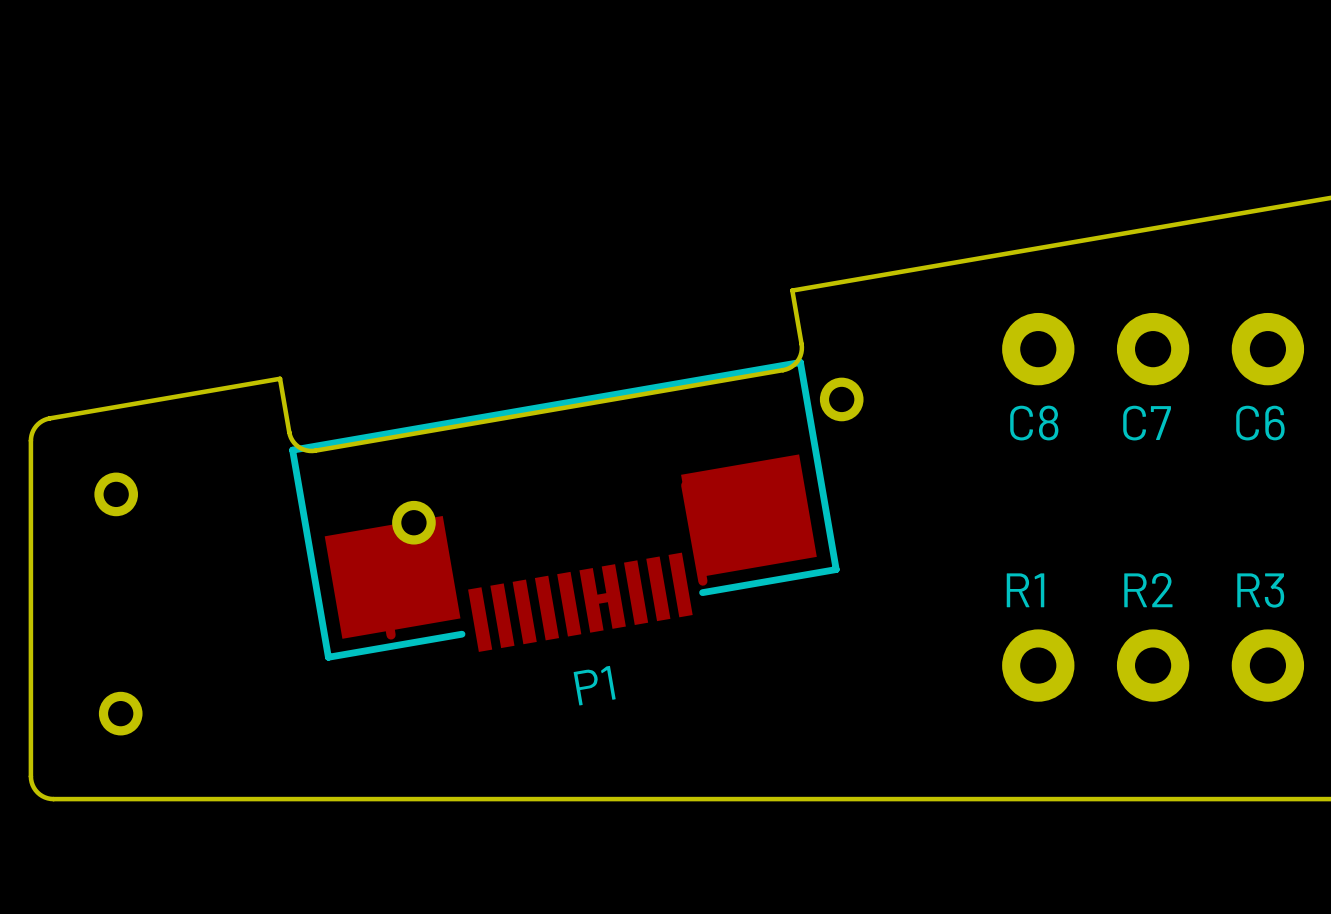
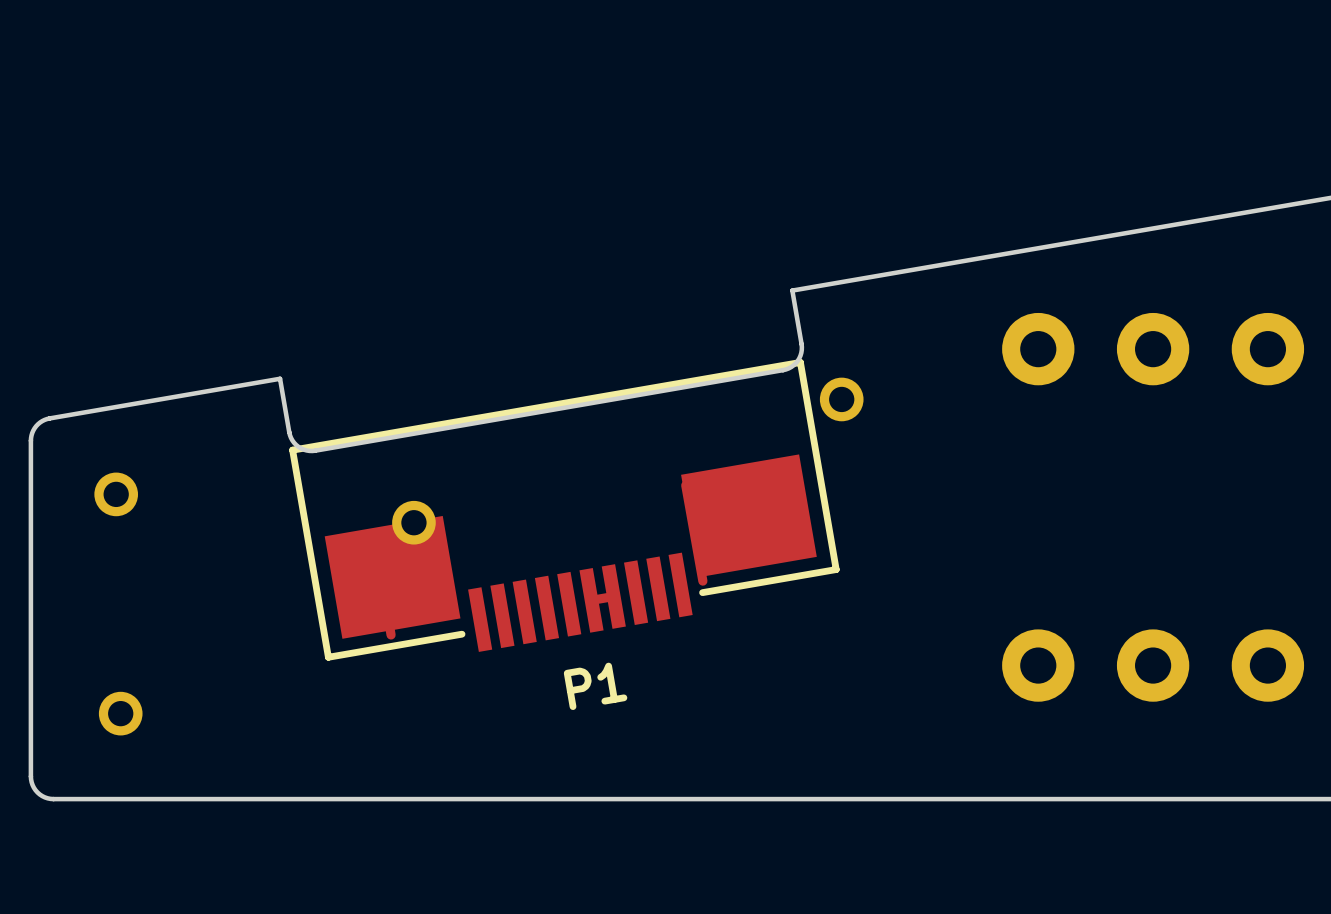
text: C8 (1034, 423) -> none
text: C7 (1147, 423) -> none
text: C6 (1260, 423) -> none
text: R1 (1025, 590) -> none
text: R2 (1148, 590) -> none
text: R3 (1260, 590) -> none

